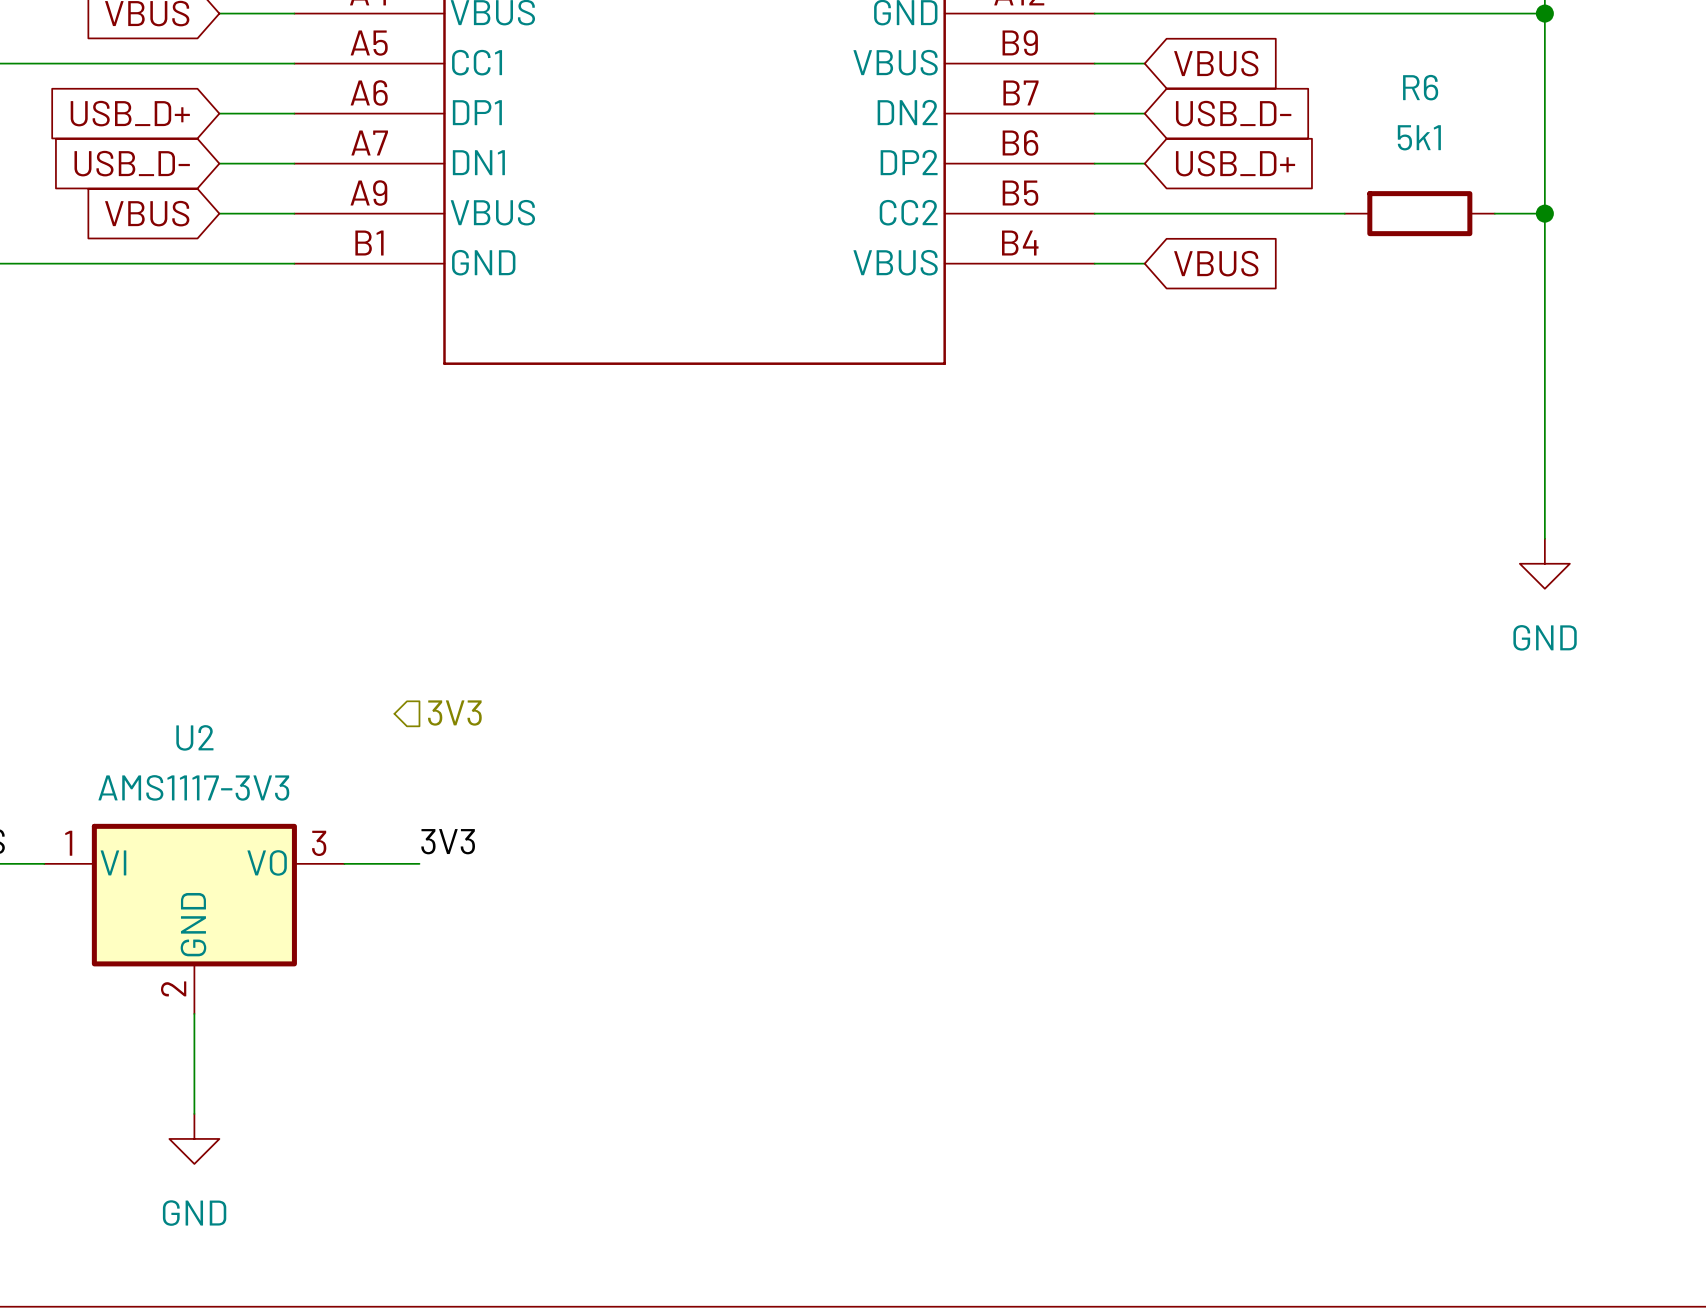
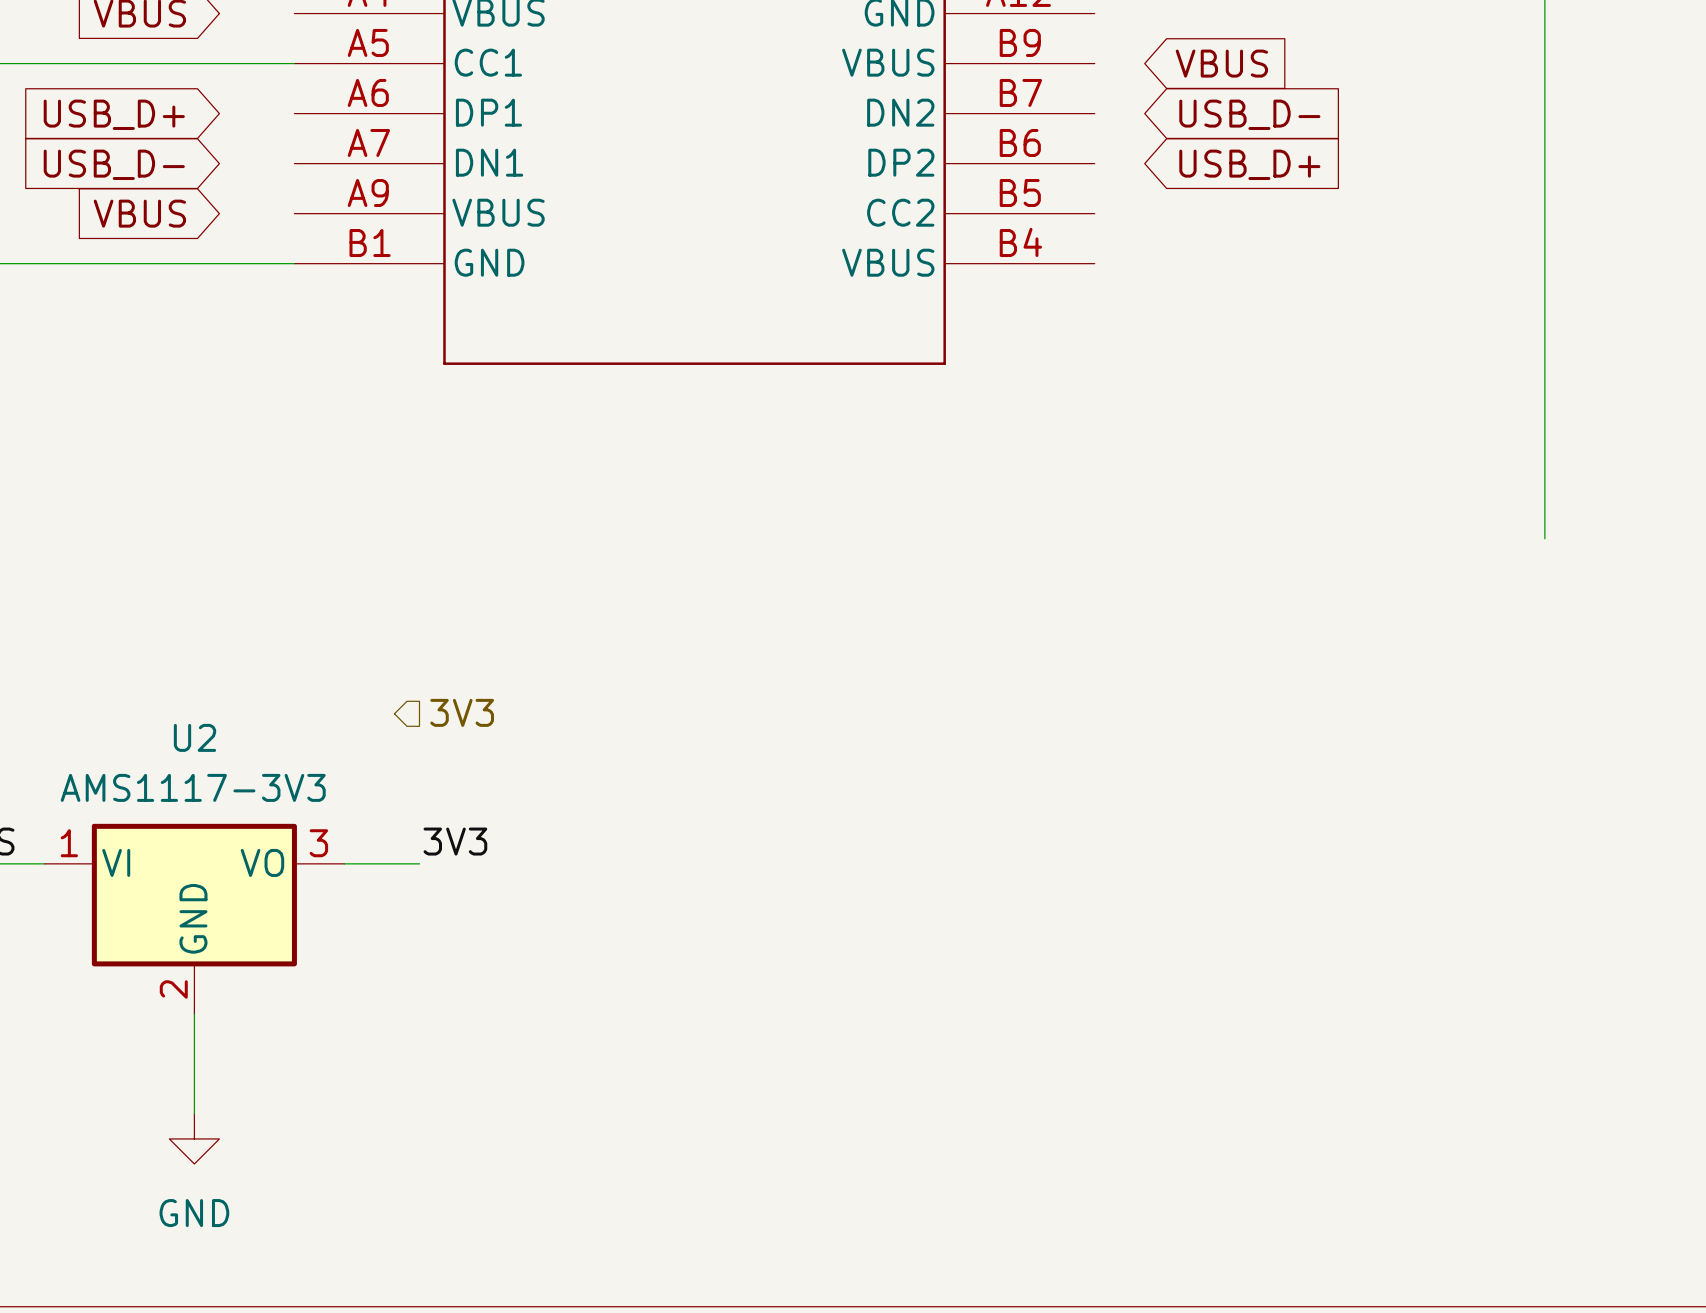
wire: (219, 13) (294, 13) -> none
wire: (1094, 13) (1544, 13) -> none
junction: (1544, 13) -> none
wire: (1094, 63) (1144, 63) -> none
wire: (219, 113) (294, 113) -> none
wire: (1094, 113) (1144, 113) -> none
wire: (219, 163) (294, 163) -> none
wire: (1094, 163) (1144, 163) -> none
wire: (219, 213) (294, 213) -> none
wire: (1094, 213) (1344, 213) -> none
R6: 5k1 (1419, 213) -> none
wire: (1494, 213) (1544, 213) -> none
junction: (1544, 213) -> none
wire: (1094, 263) (1144, 263) -> none
global label: VBUS (1216, 263) -> none
power symbol: GND (1544, 563) -> none

